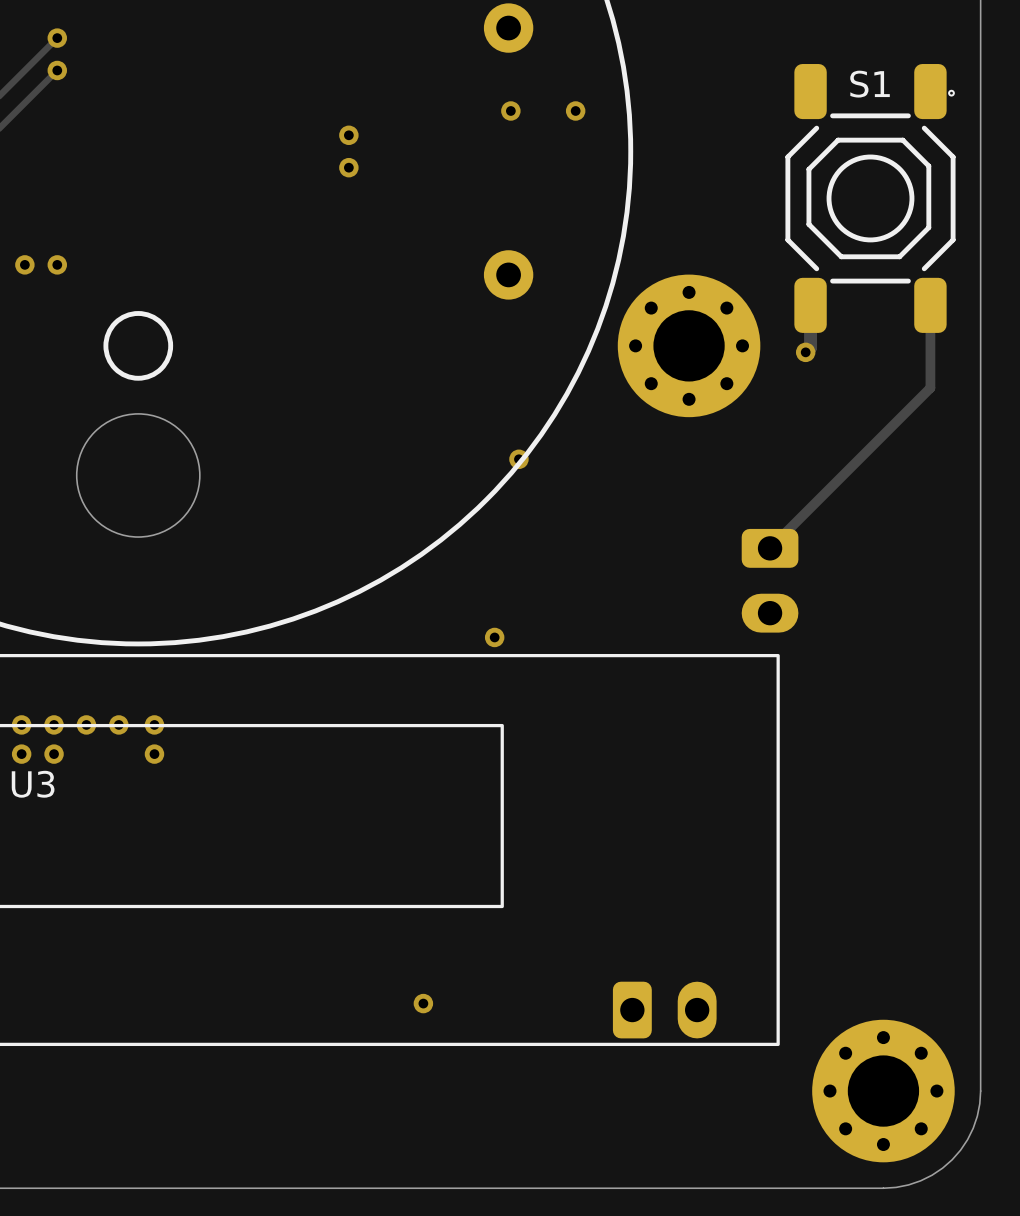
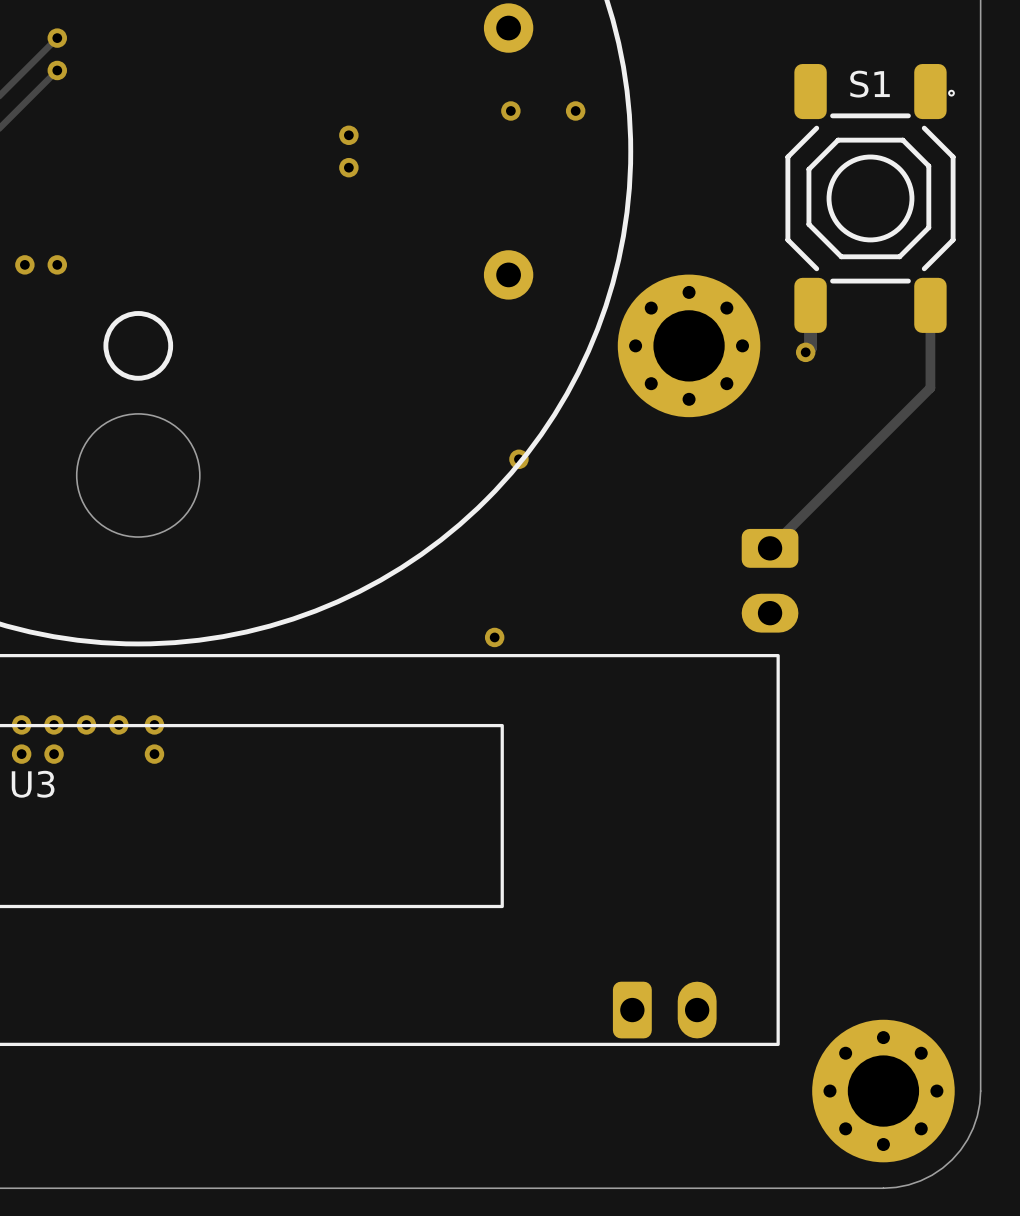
via: (423, 1003) -> none

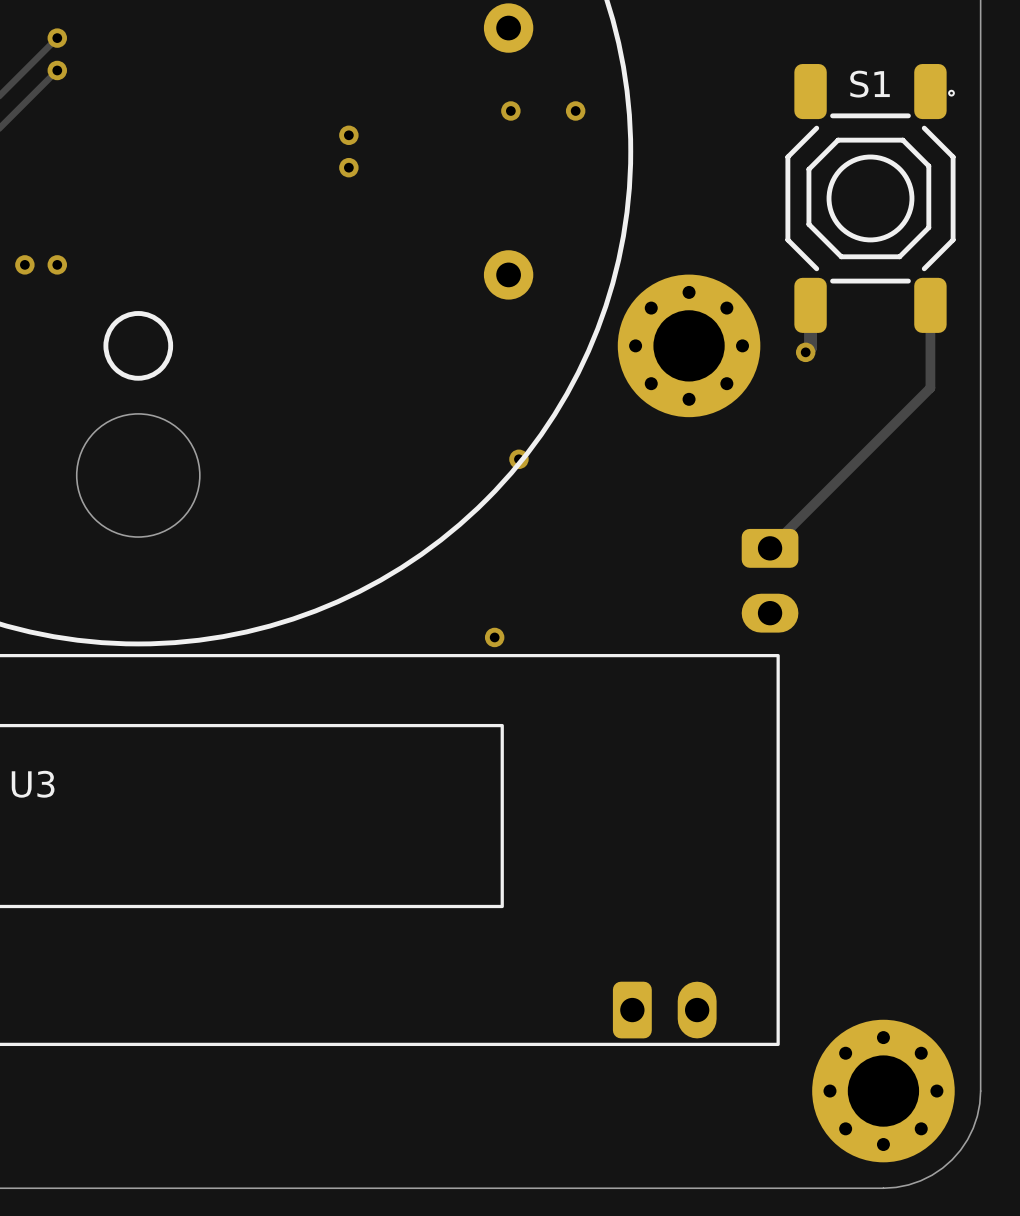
via: (21, 724) -> none
via: (54, 724) -> none
via: (86, 724) -> none
via: (118, 724) -> none
via: (154, 724) -> none
via: (21, 754) -> none
via: (54, 754) -> none
via: (154, 754) -> none

